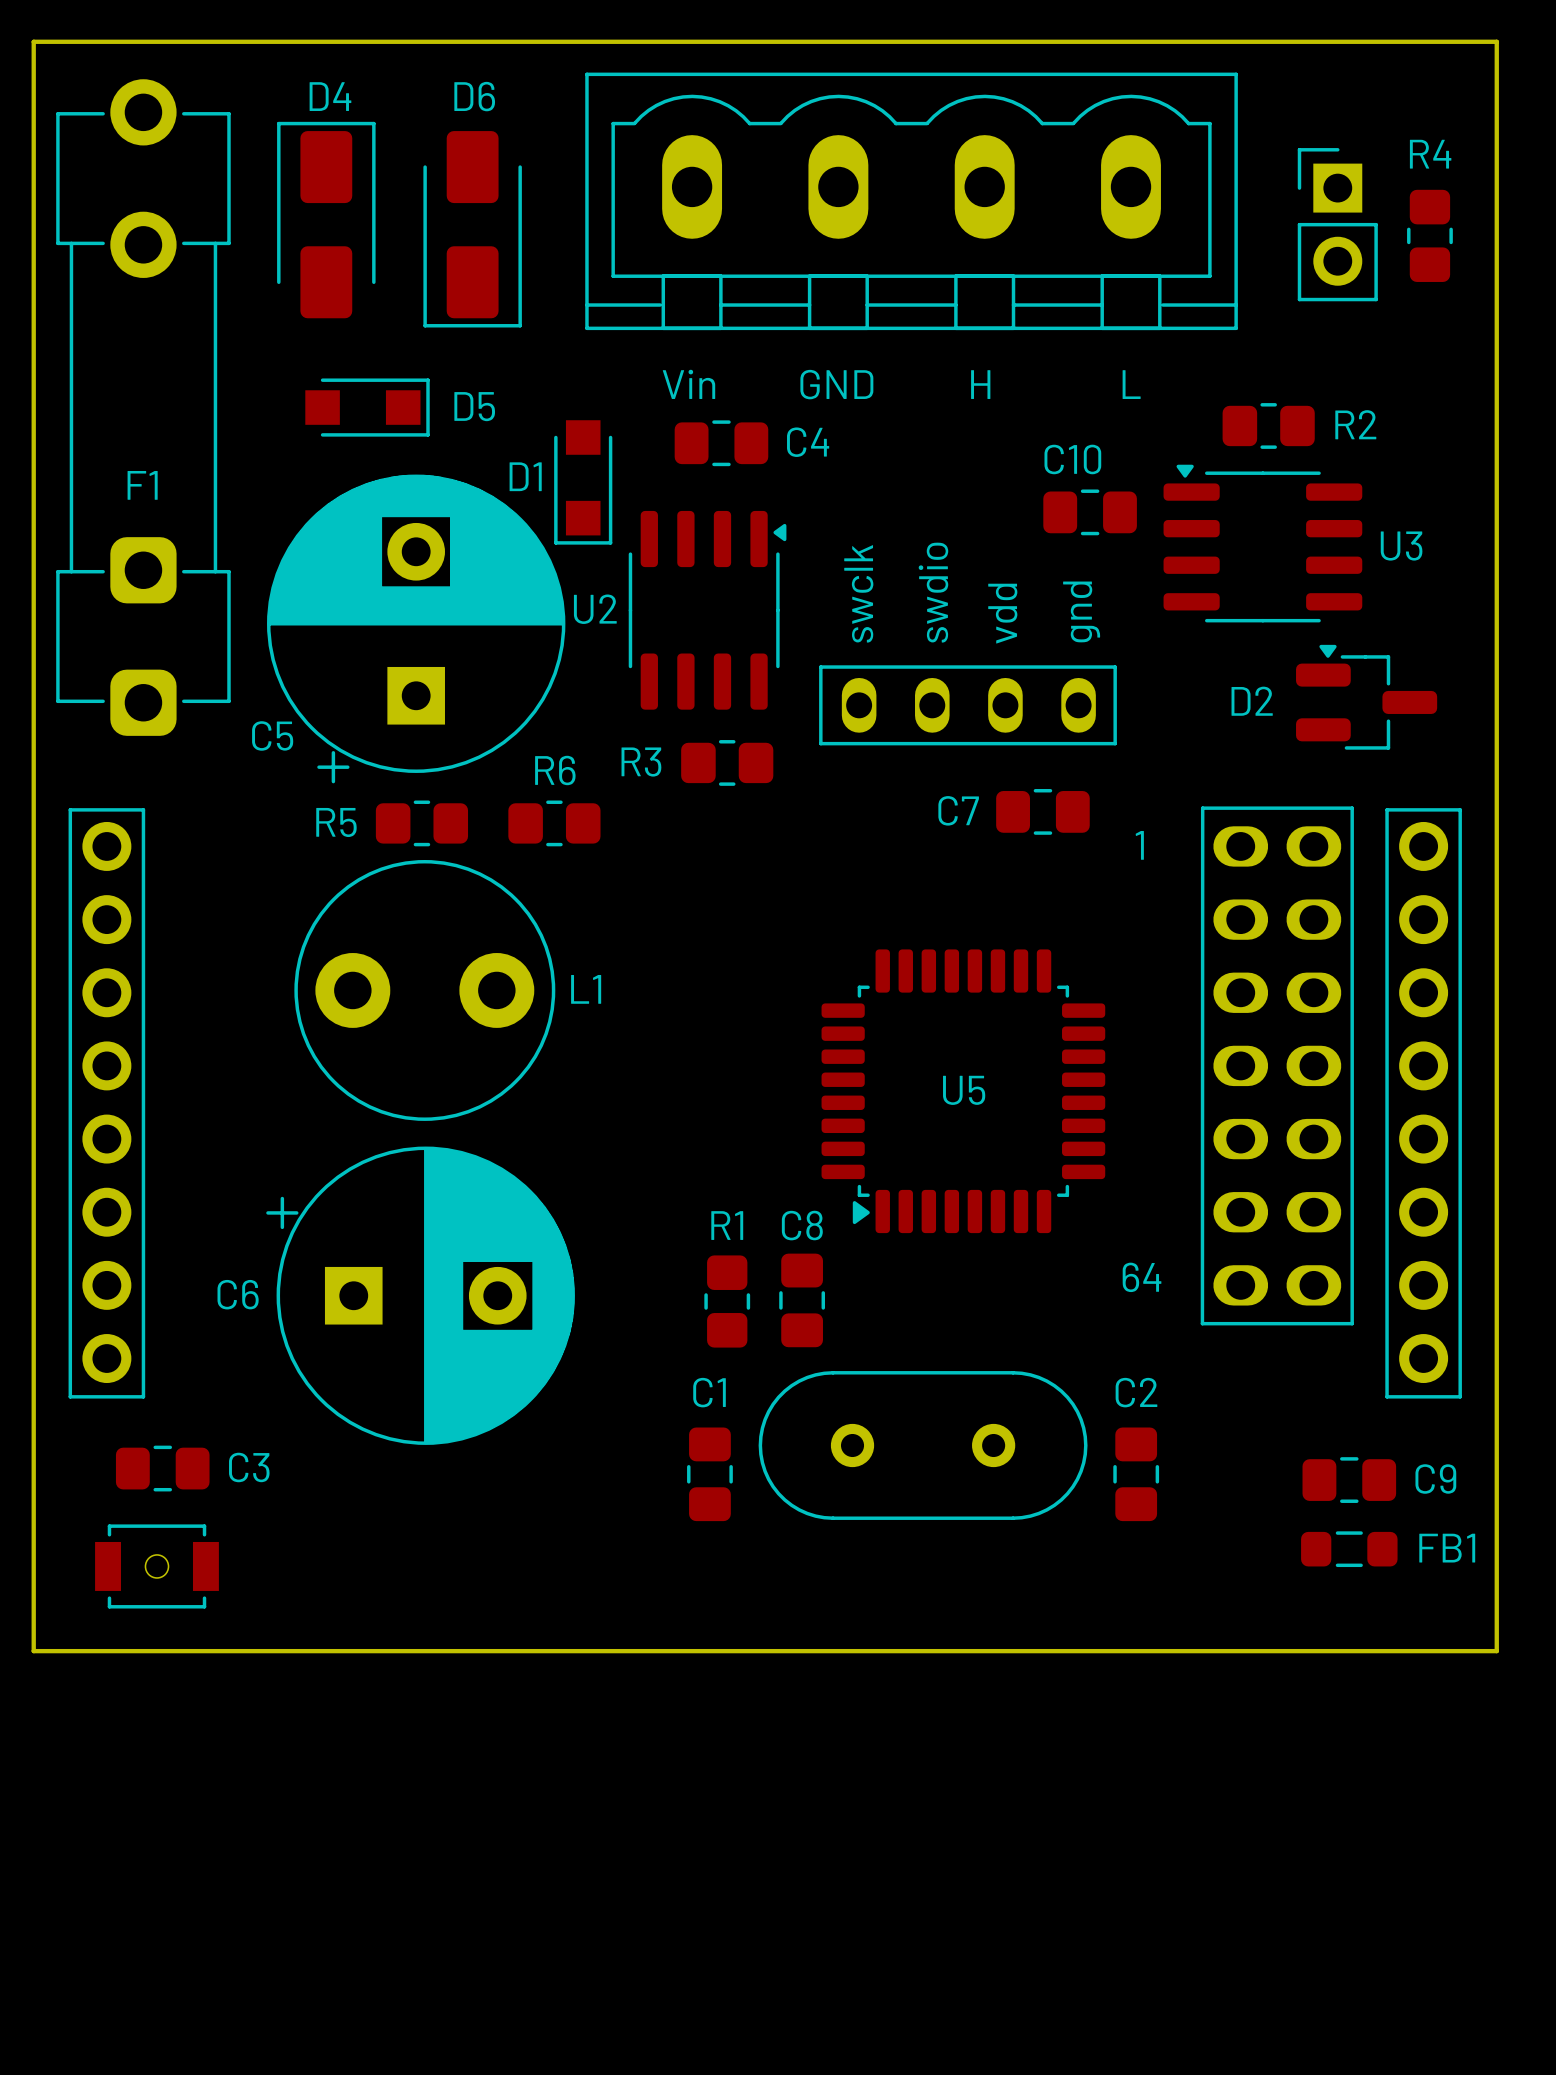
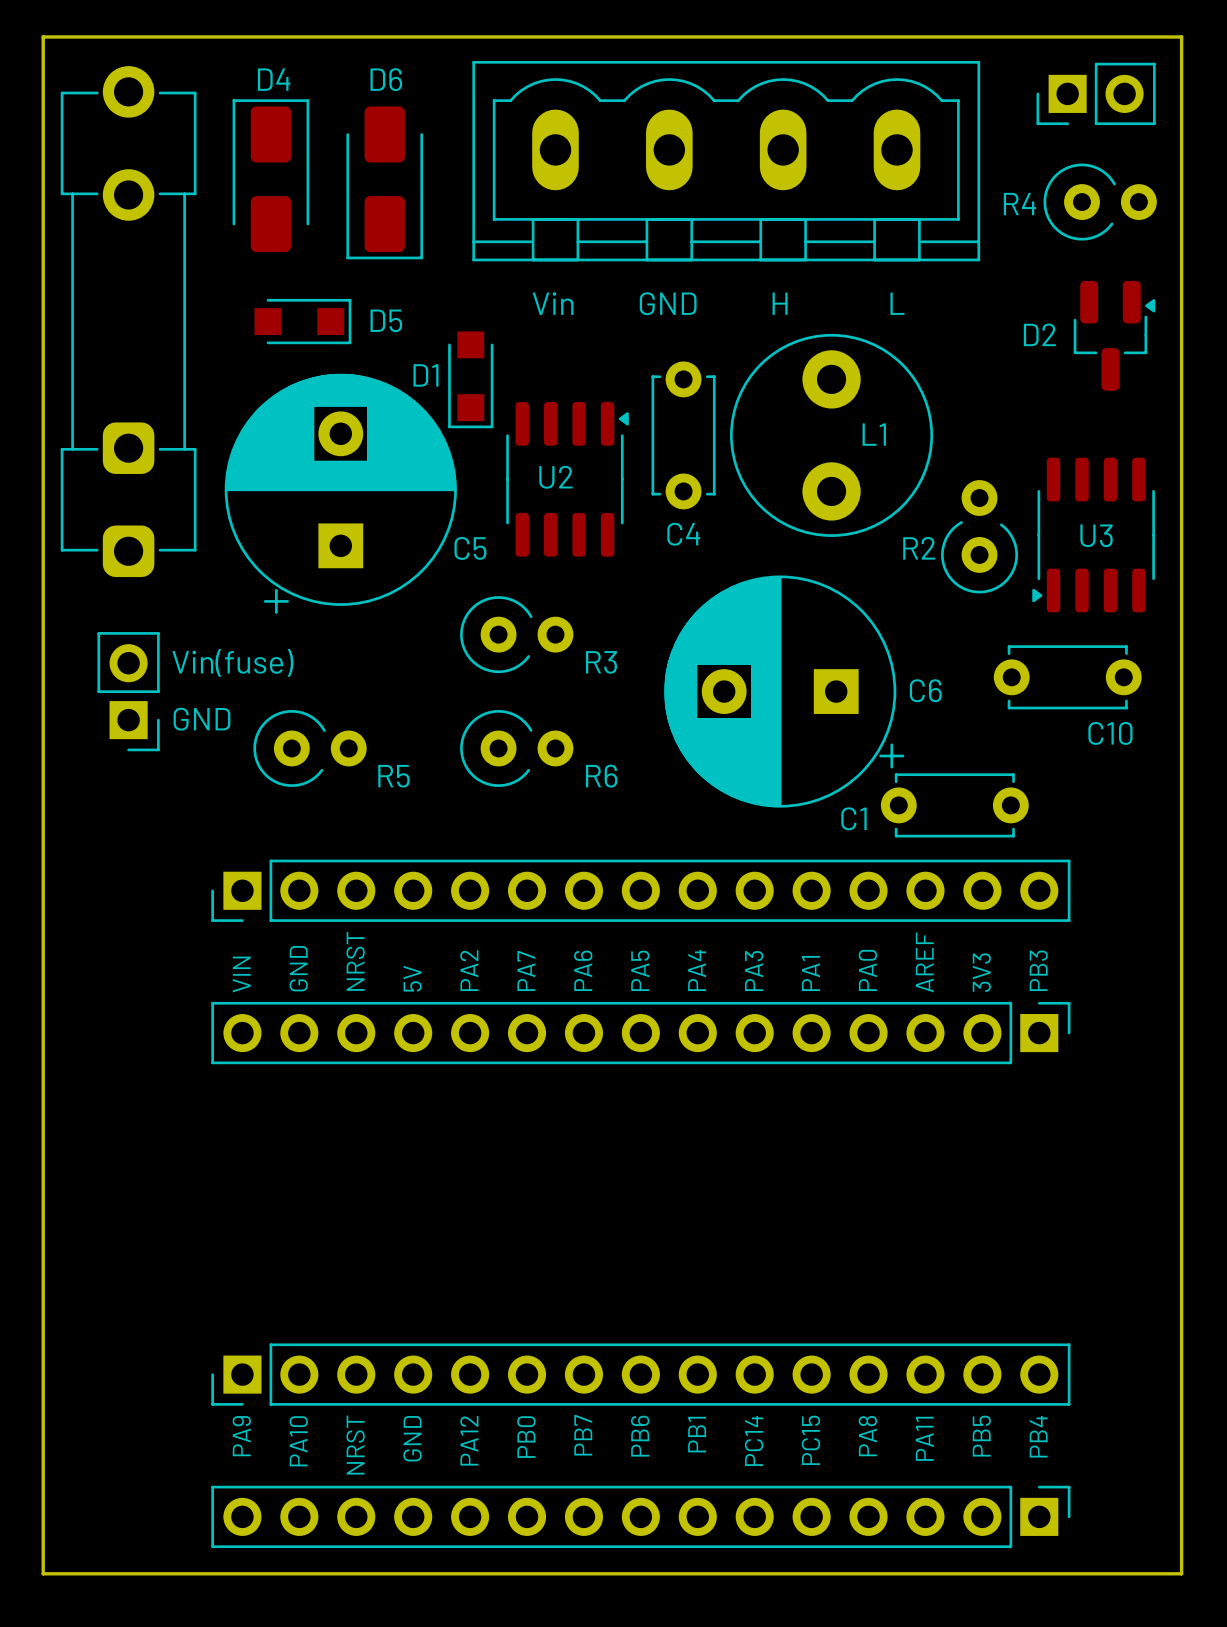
R4 name position: R4 (1430, 154) -> R4 (1019, 204)
R4 footprint: [1407, 189, 1453, 282] -> [1043, 163, 1157, 241]
part rotation: 0° (1337, 224) -> 90° counterclockwise (1096, 93)
part position: (1337, 224) -> (1096, 93)
R2 footprint: [1222, 403, 1315, 449] -> [941, 480, 1019, 594]
C4 footprint: [674, 420, 769, 467] -> [651, 361, 716, 510]
R2 name position: R2 (1355, 424) -> R2 (919, 548)
C4 name position: C4 (808, 442) -> C4 (683, 534)
C10 name position: C10 (1072, 459) -> C10 (1110, 733)
F1 name: F1 (142, 485) -> none
C10 footprint: [1043, 489, 1137, 536] -> [993, 645, 1142, 710]
U3 rotation: 0° (1262, 543) -> 90° counterclockwise (1093, 535)
U3 position: (1262, 543) -> (1093, 535)
U3 name position: U3 (1401, 546) -> U3 (1096, 535)
text: swdio (933, 592) -> none
text: swclk (858, 593) -> none
U2 name position: U2 (595, 609) -> U2 (555, 477)
text: gnd (1081, 611) -> none
text: vdd (1002, 613) -> none
D2 rotation: 0° (1366, 697) -> 90° clockwise (1114, 335)
D2 position: (1366, 697) -> (1114, 335)
part: (968, 705) -> none
C5 name position: C5 (272, 735) -> C5 (470, 548)
R3 footprint: [681, 740, 774, 786] -> [460, 596, 574, 674]
R3 name position: R3 (641, 762) -> R3 (601, 662)
R6 name position: R6 (555, 770) -> R6 (601, 776)
R5 footprint: [375, 800, 469, 847] -> [253, 709, 367, 787]
R6 footprint: [508, 800, 601, 847] -> [460, 709, 574, 787]
C7: (1042, 811) -> none
R5 name position: R5 (336, 822) -> R5 (393, 776)
text: 1 (1139, 845) -> none
text: none -> Vin(fuse) (232, 662)
part: none -> (128, 691)
text: none -> GND (201, 719)
L1 name position: L1 (586, 989) -> L1 (874, 434)
L1 rotation: 0° (424, 990) -> 90° clockwise (831, 435)
L1 position: (424, 990) -> (831, 435)
part: (1277, 1065) -> none
U5: (963, 1091) -> none
part: (106, 1103) -> none
part: (1423, 1103) -> none
part: none -> (640, 890)
text: none -> NRST (355, 961)
text: none -> AREF (924, 962)
text: none -> GND (298, 968)
text: none -> PA2 (469, 970)
text: none -> PA6 (583, 970)
text: none -> PA5 (640, 970)
text: none -> PA4 (697, 970)
text: none -> PA0 (867, 970)
text: none -> PB3 (1038, 970)
text: none -> PA7 (526, 970)
text: none -> PA3 (754, 971)
text: none -> 3V3 (981, 972)
text: none -> PA1 (810, 973)
text: none -> VIN (241, 974)
text: none -> 5V (412, 978)
text: 64 (1142, 1277) -> none
C6 rotation: 0° (420, 1295) -> 180° (784, 691)
C6 position: (420, 1295) -> (784, 691)
C8: (802, 1300) -> none
R1: (727, 1301) -> none
part: none -> (640, 1033)
C1 name position: C1 (709, 1392) -> C1 (853, 818)
C1 footprint: [687, 1427, 733, 1522] -> [880, 773, 1029, 838]
part: (923, 1445) -> none
C3: (162, 1468) -> none
C2: (1136, 1474) -> none
C9: (1349, 1480) -> none
FB1: (1349, 1549) -> none
part: (156, 1566) -> none
board edge: (33, 1651) (1496, 1651) -> (43, 1289) (43, 1573) (1181, 1573) (1181, 1289)
part: none -> (640, 1374)
text: none -> PB1 (697, 1434)
text: none -> PB7 (583, 1435)
text: none -> PB6 (640, 1436)
text: none -> PA8 (867, 1436)
text: none -> PB5 (981, 1436)
text: none -> PA9 (241, 1436)
text: none -> PB4 (1038, 1436)
text: none -> PB0 (526, 1437)
text: none -> GND (412, 1438)
text: none -> PA11 (924, 1438)
text: none -> PA12 (469, 1440)
text: none -> PC15 (810, 1440)
text: none -> PA10 (298, 1441)
text: none -> PC14 (754, 1440)
text: none -> NRST (355, 1445)
part: none -> (640, 1516)

